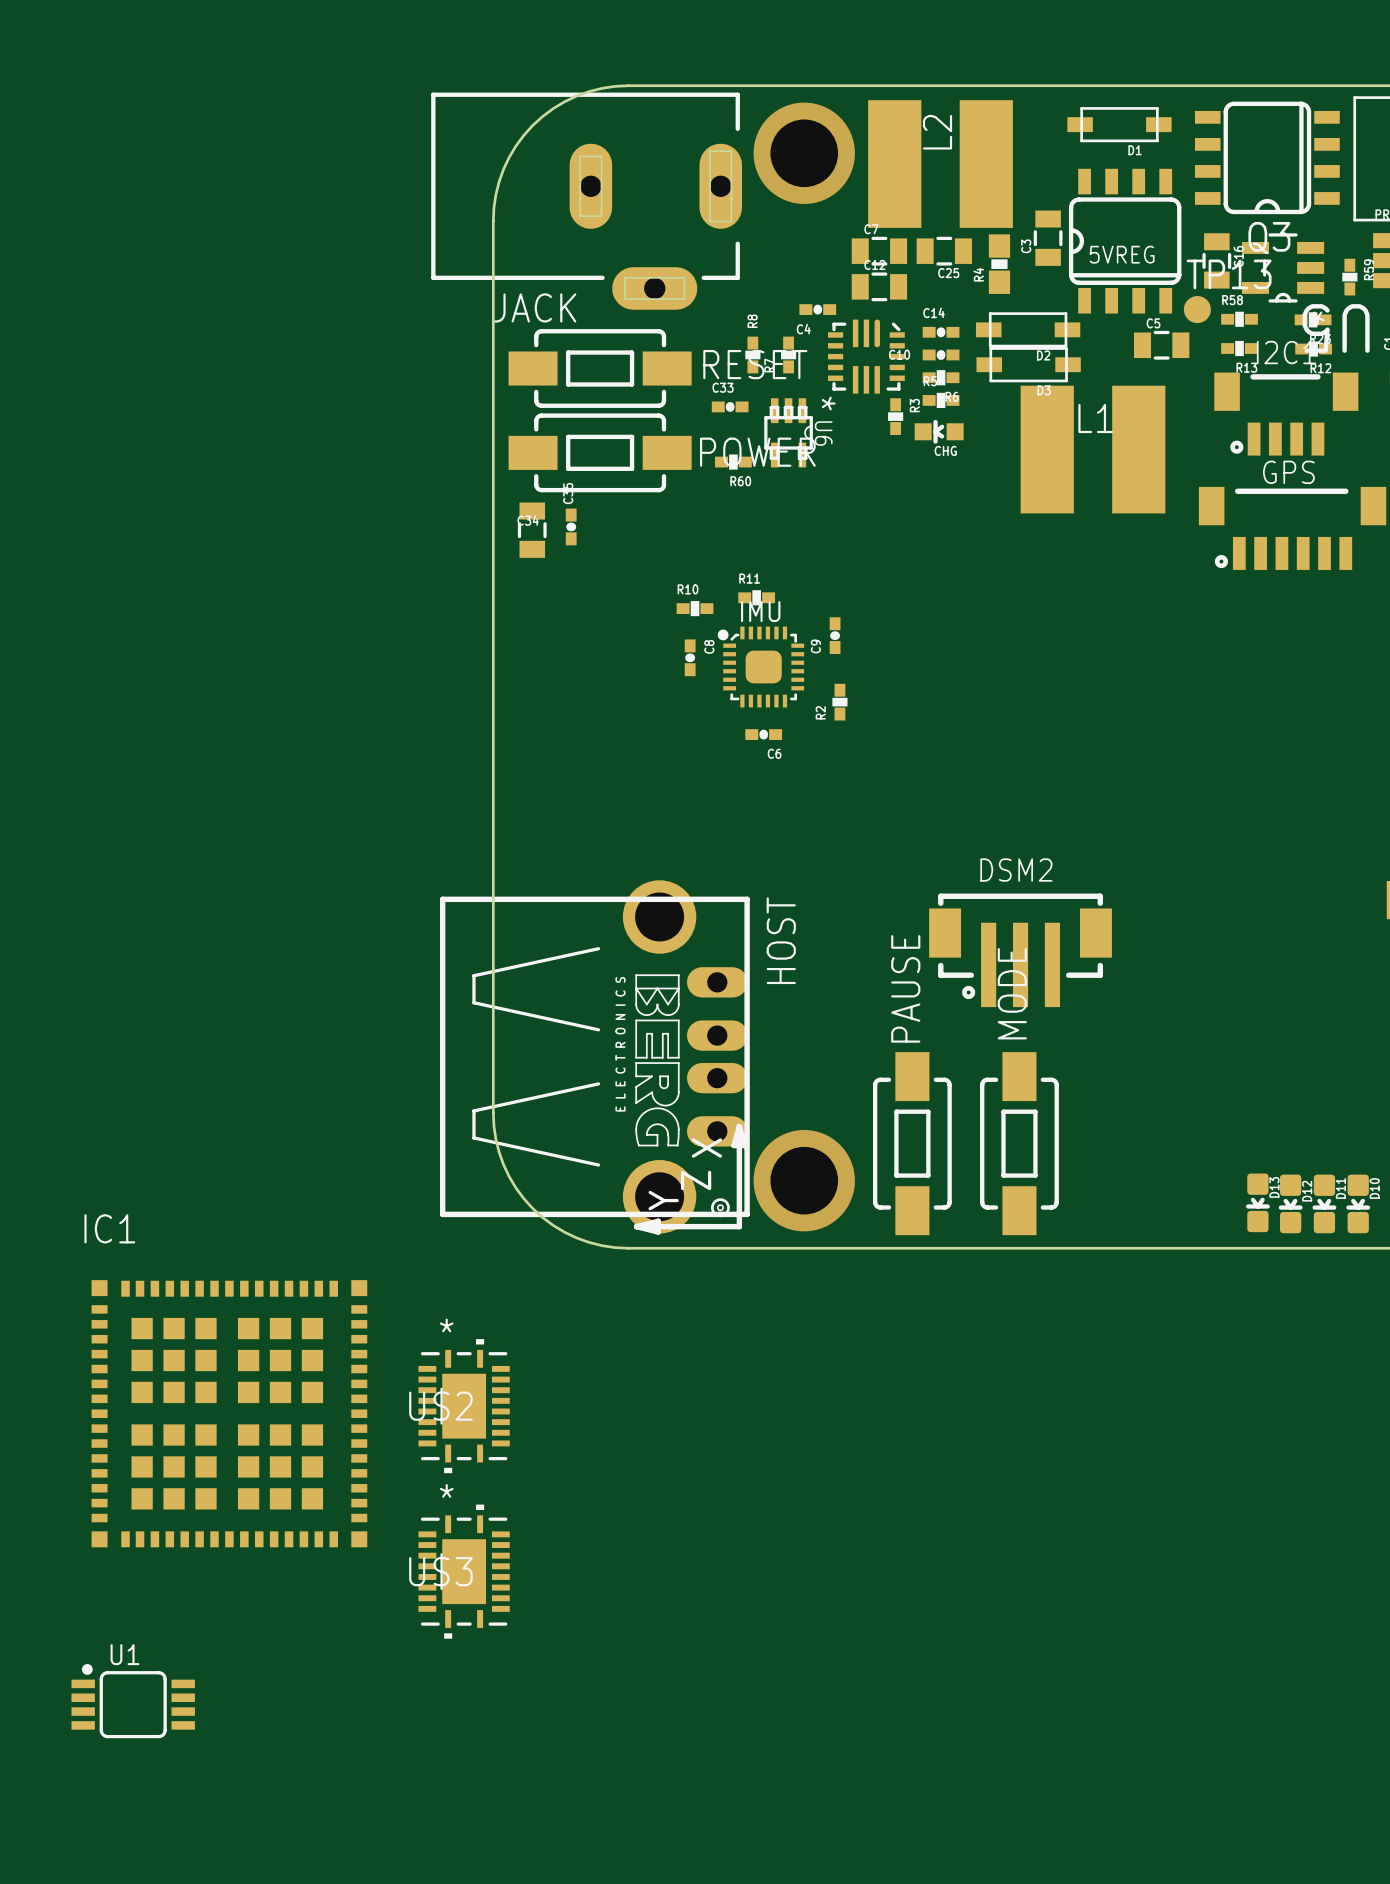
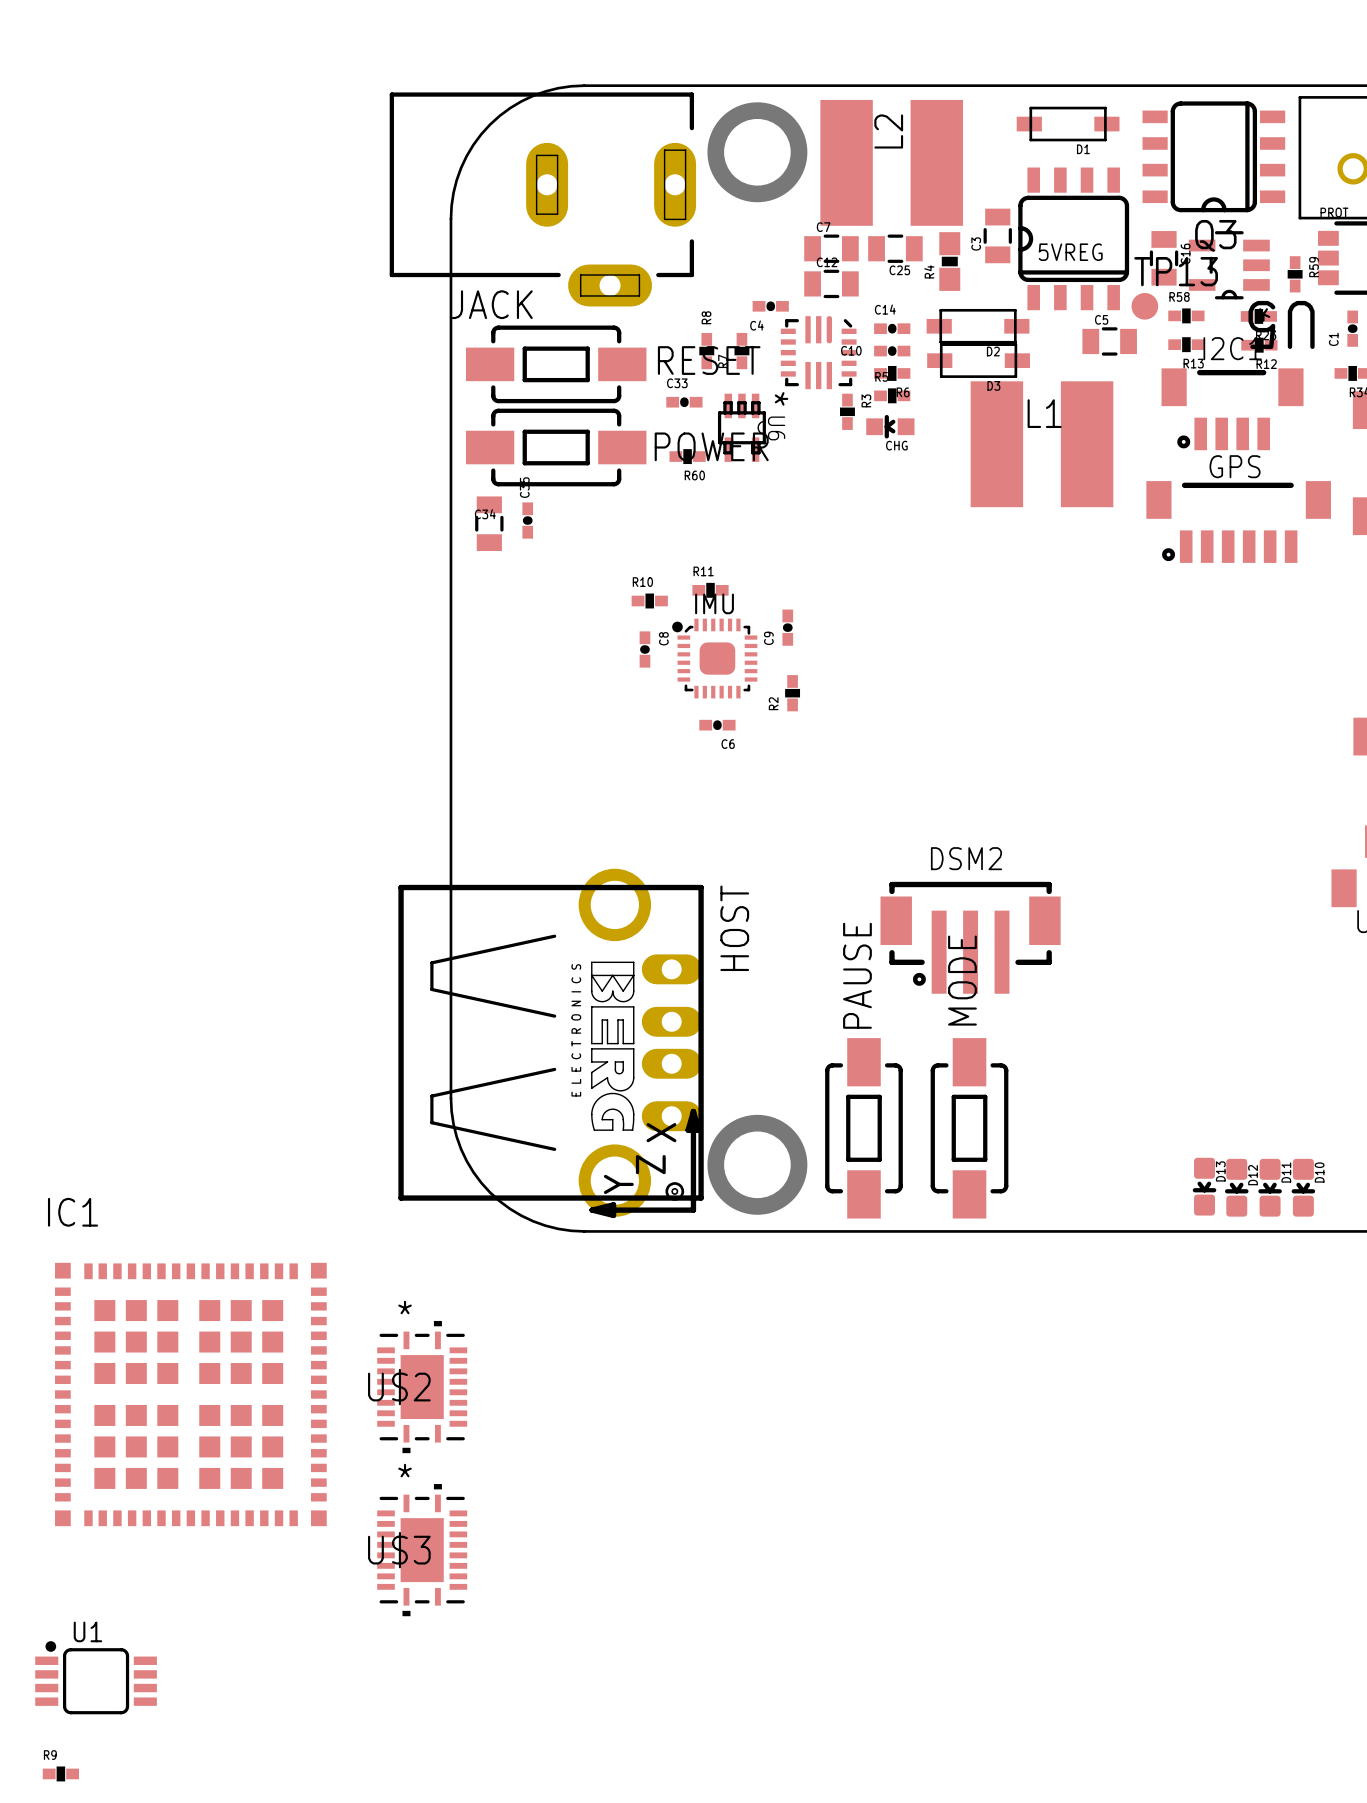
R9: none -> (60, 1773)

